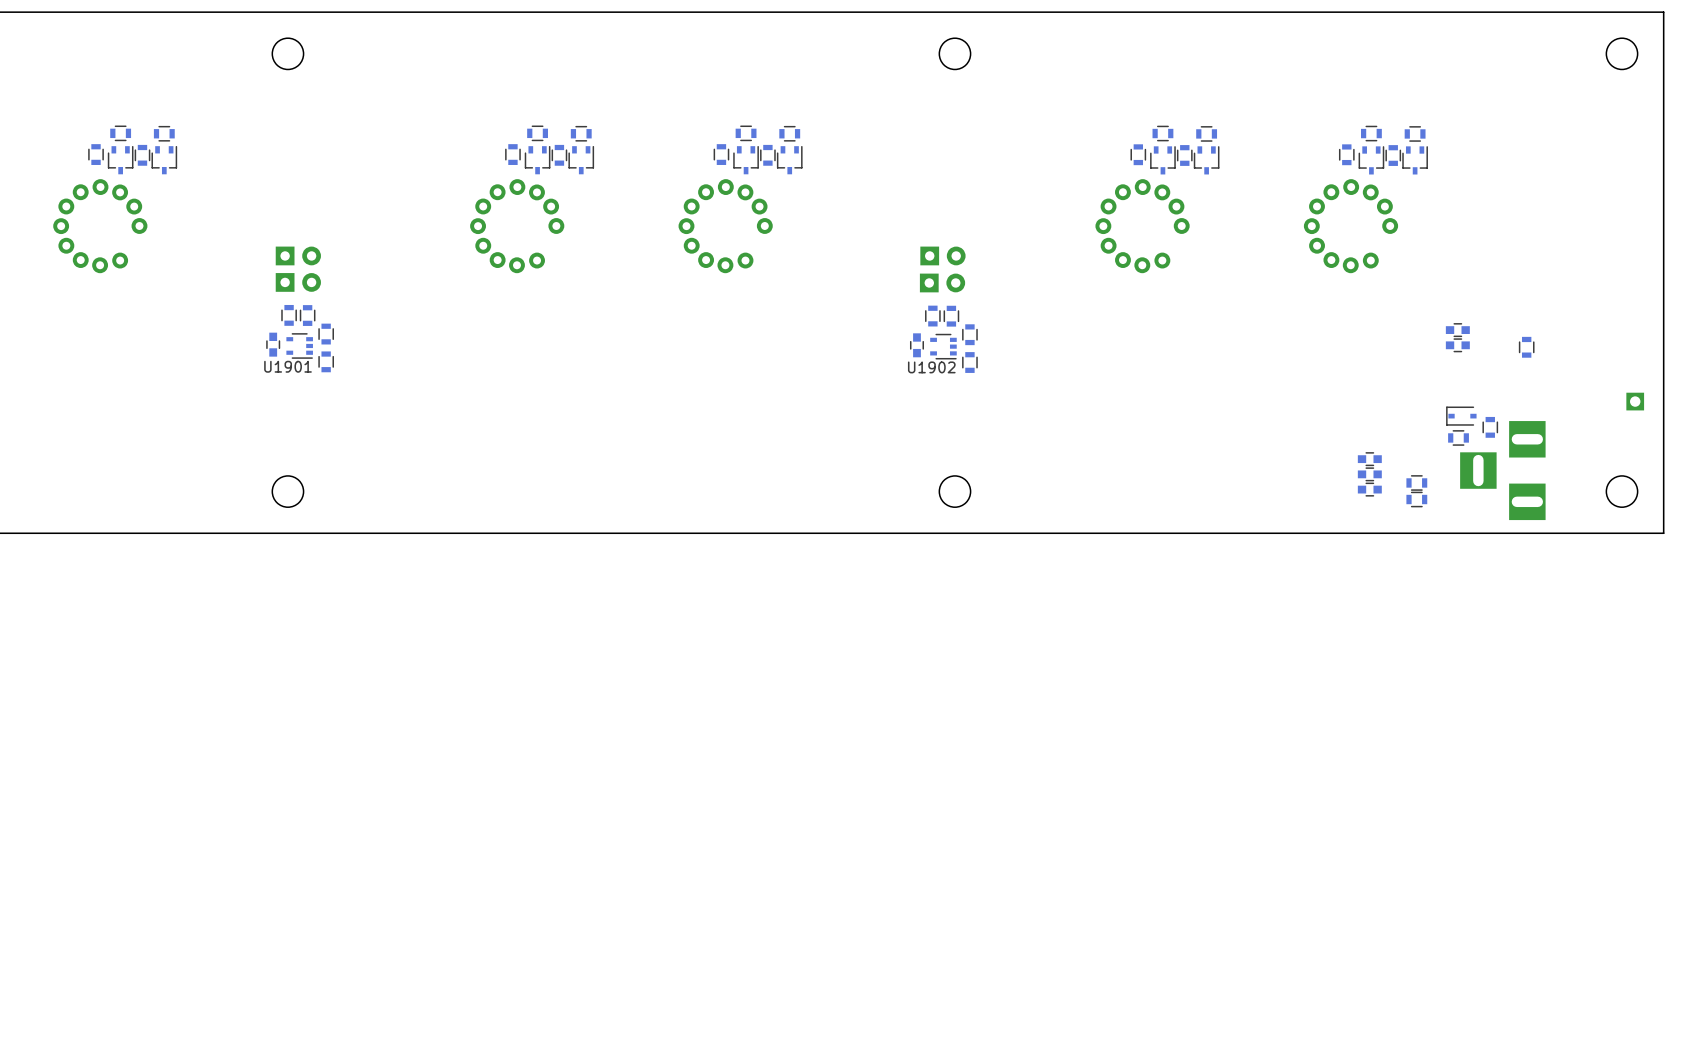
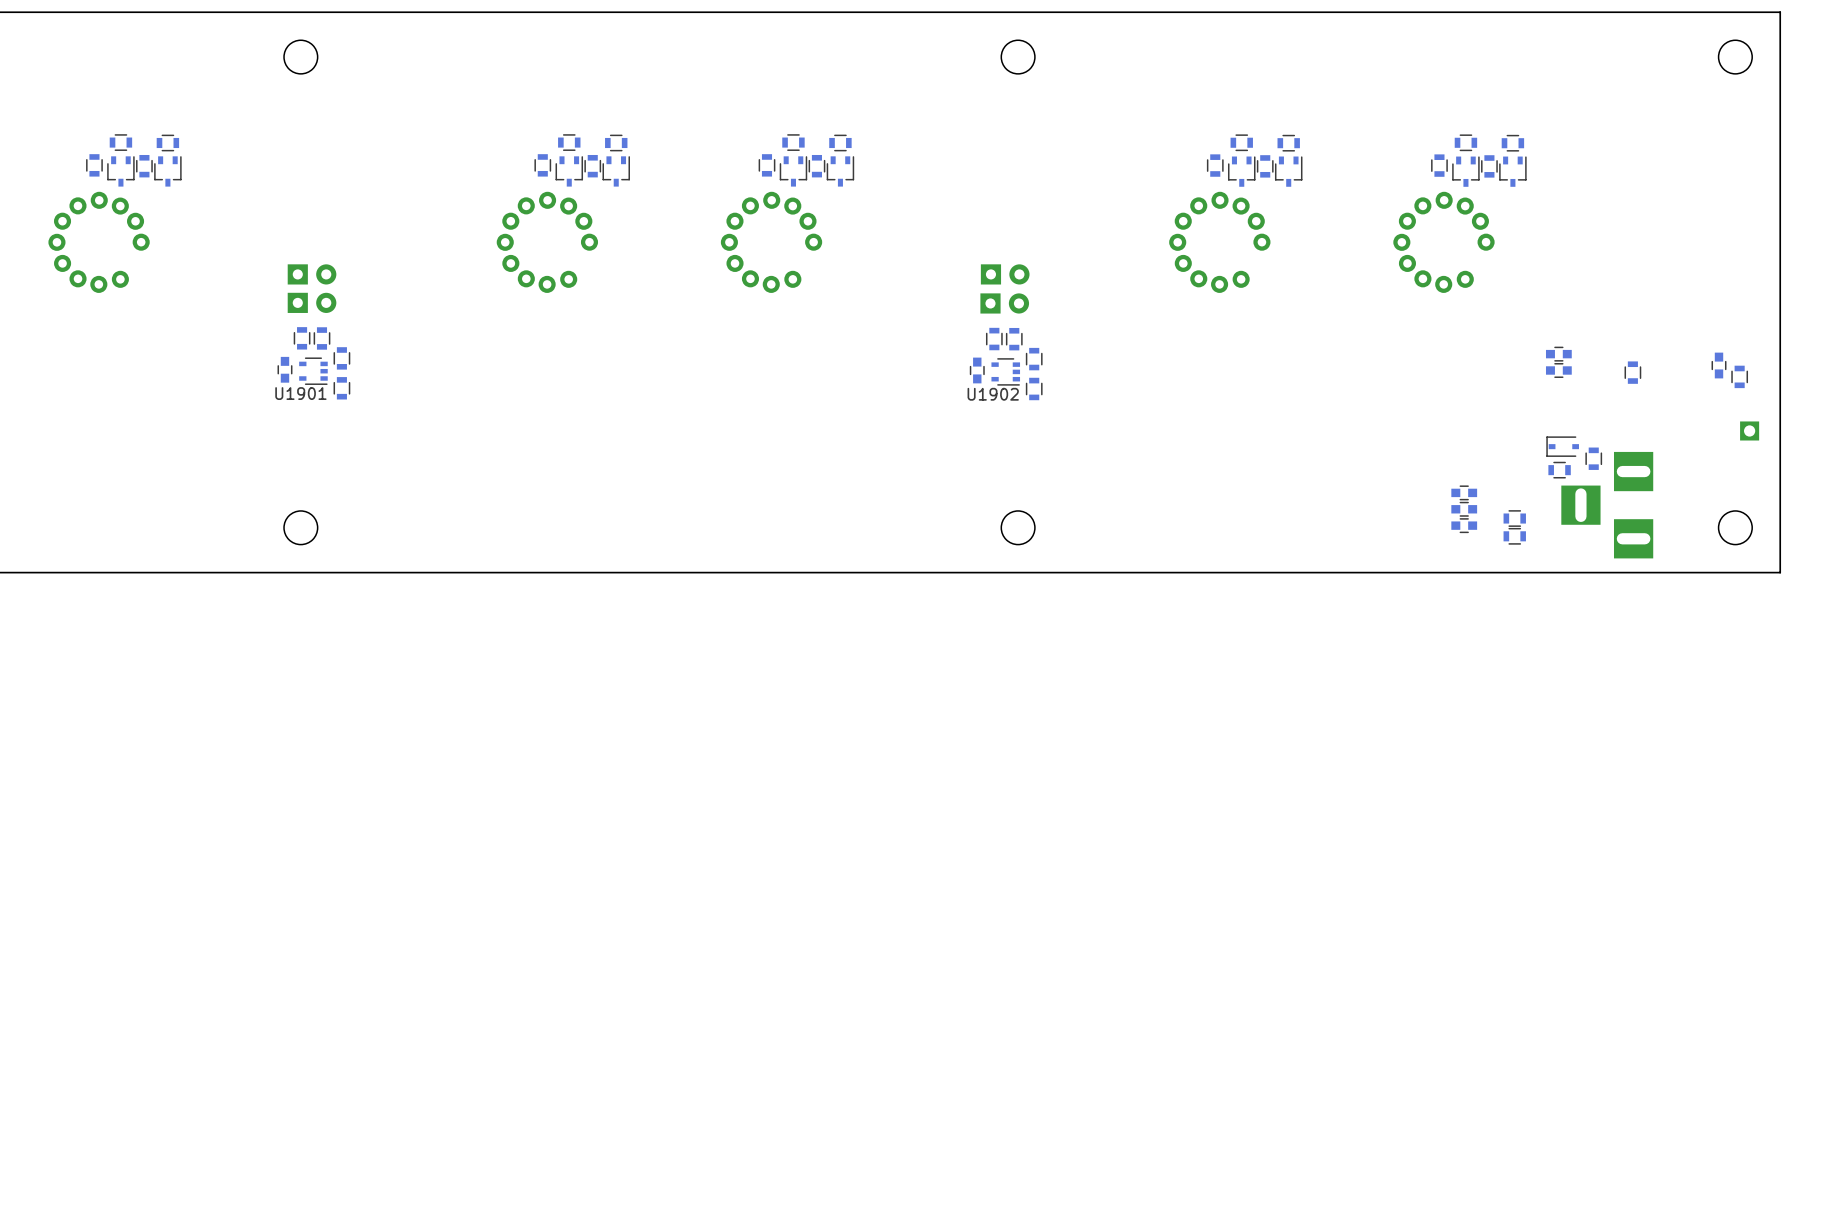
part: none -> (1719, 365)
part: none -> (1739, 376)

